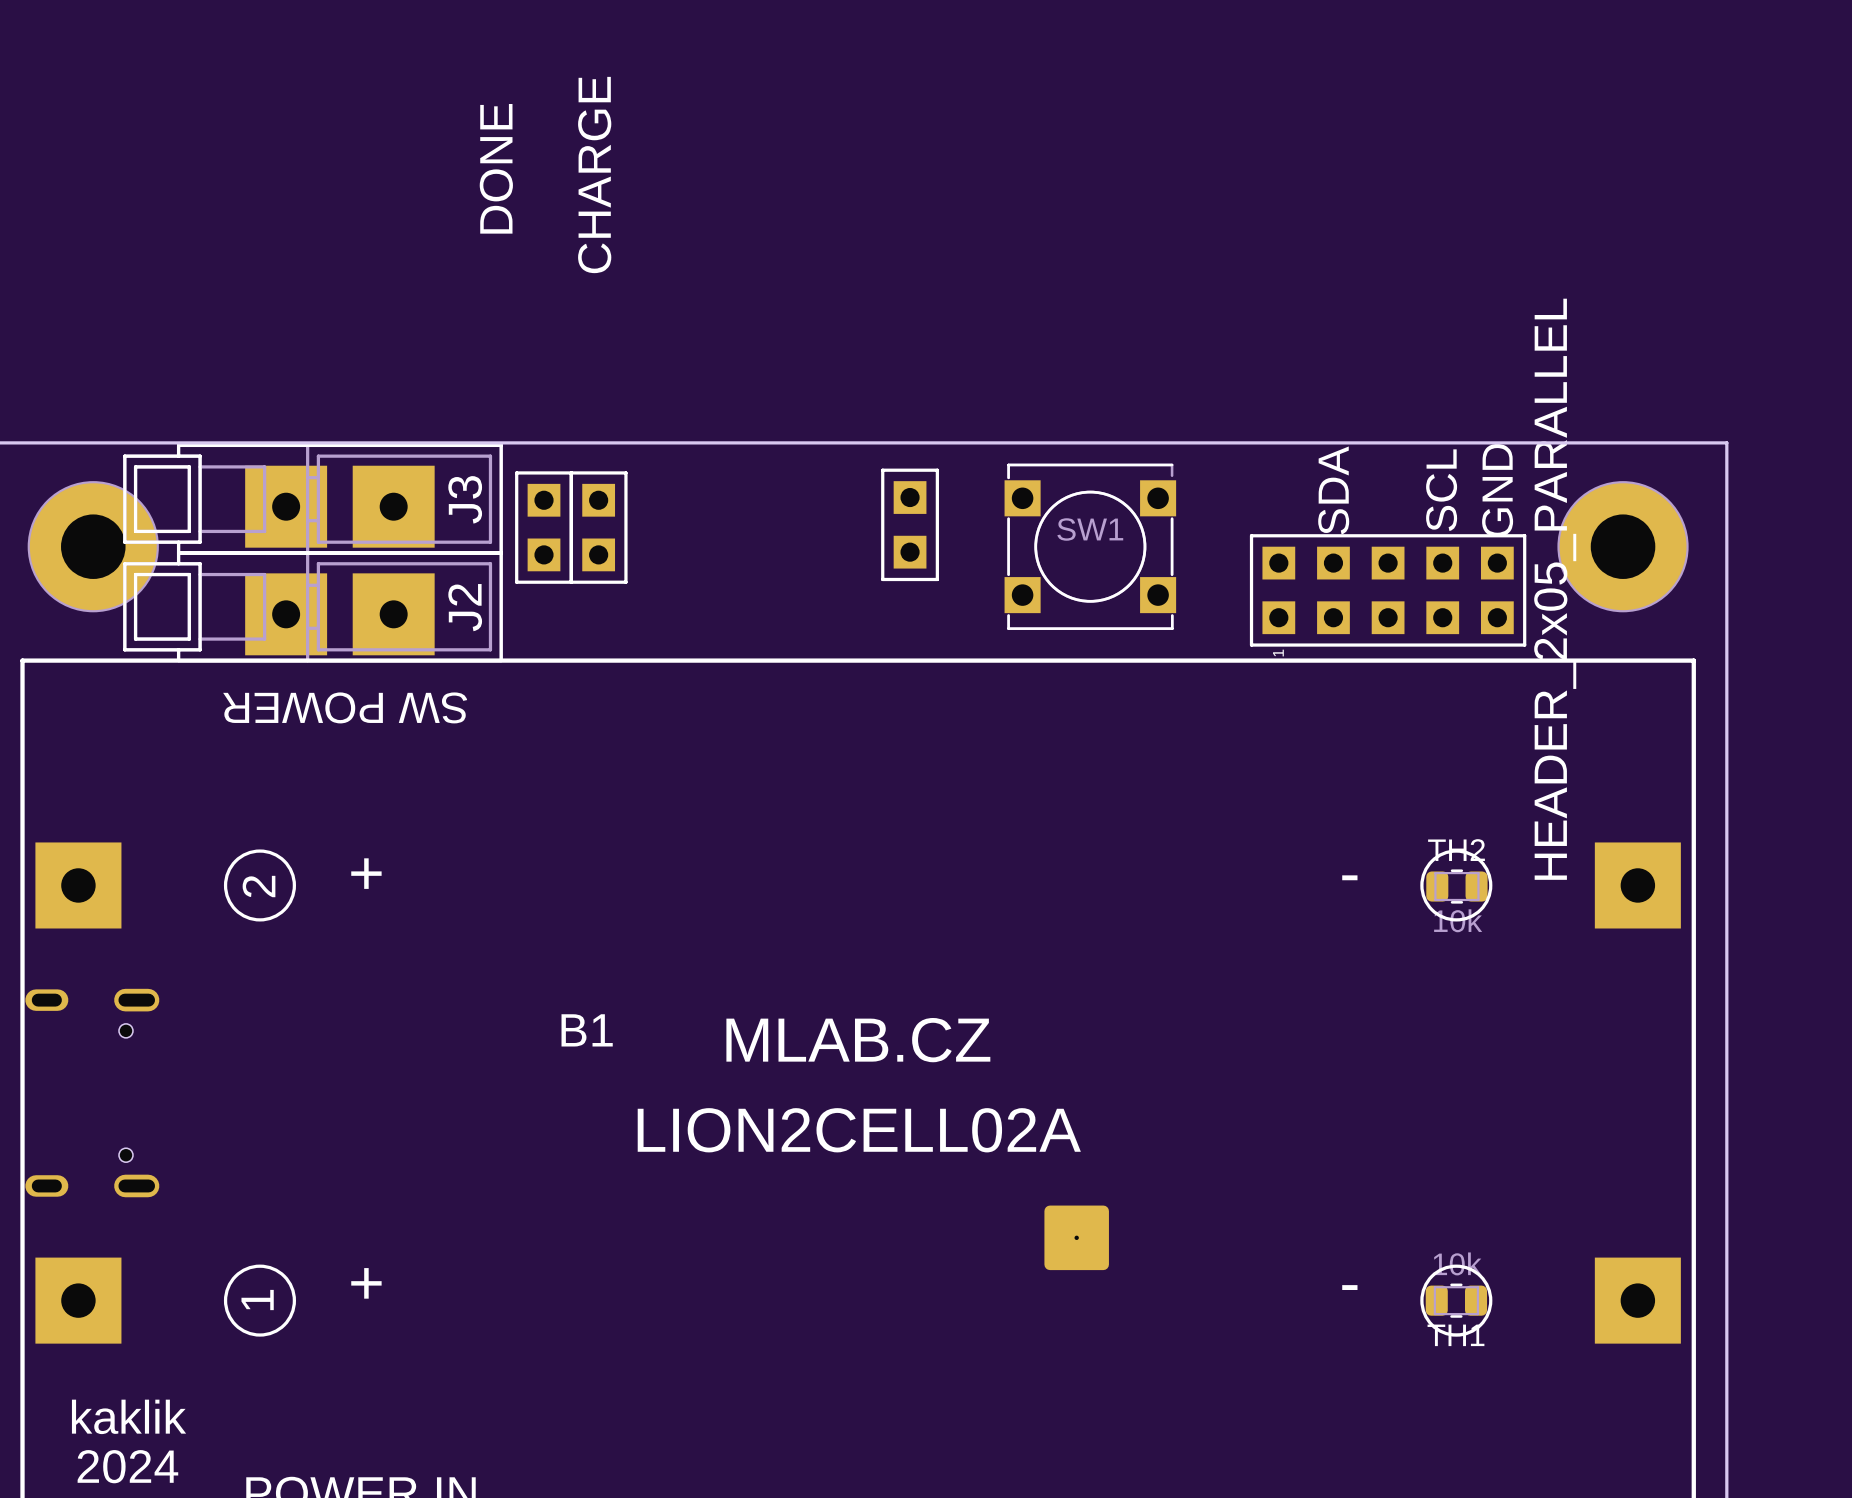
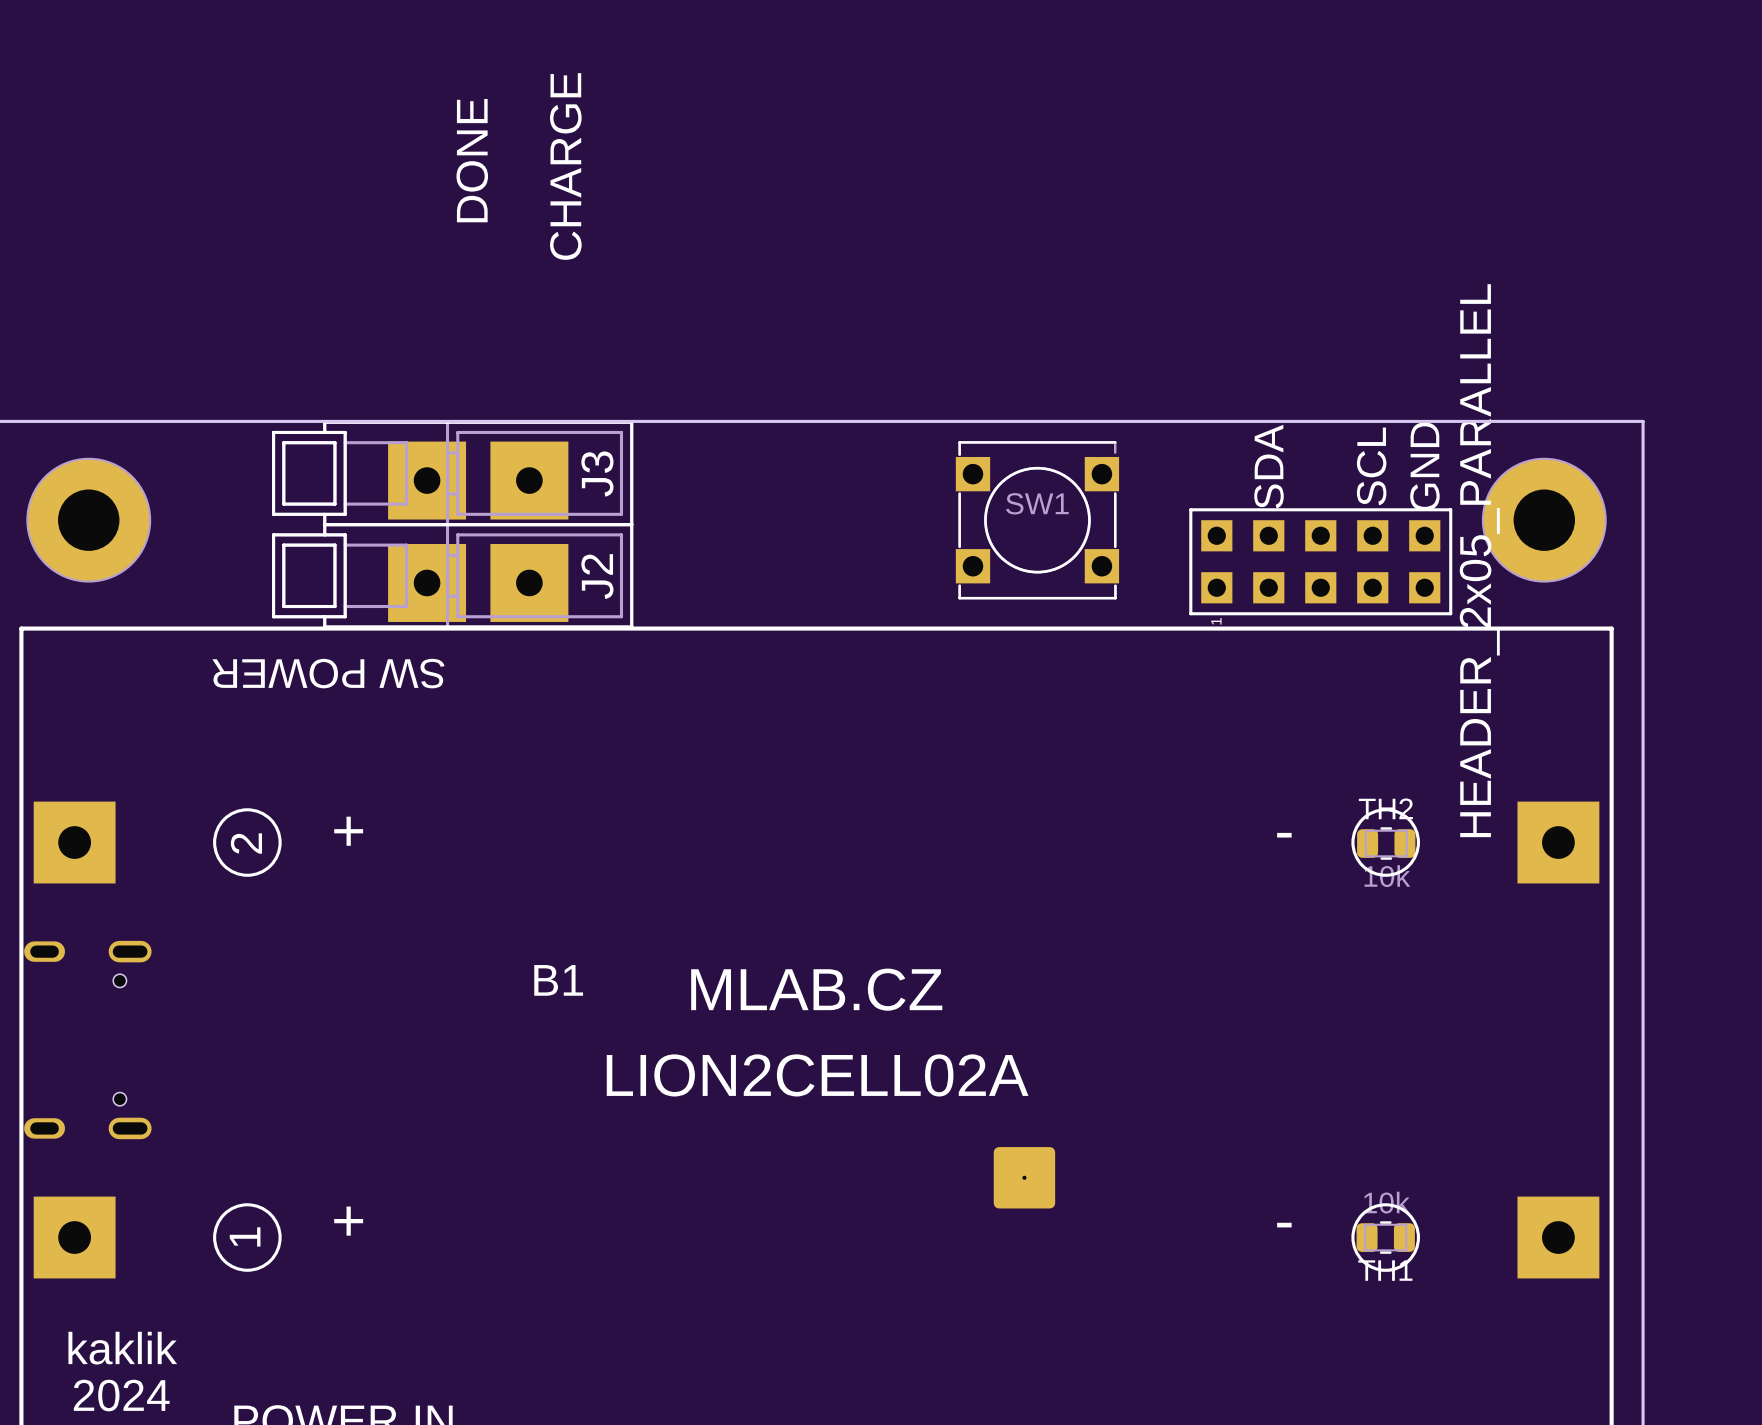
J3 footprint: [123, 443, 503, 555] -> [272, 420, 634, 527]
part: (910, 524) -> none
part: (544, 527) -> none
part: (598, 527) -> none
J2 footprint: [123, 551, 503, 663] -> [272, 523, 634, 629]

